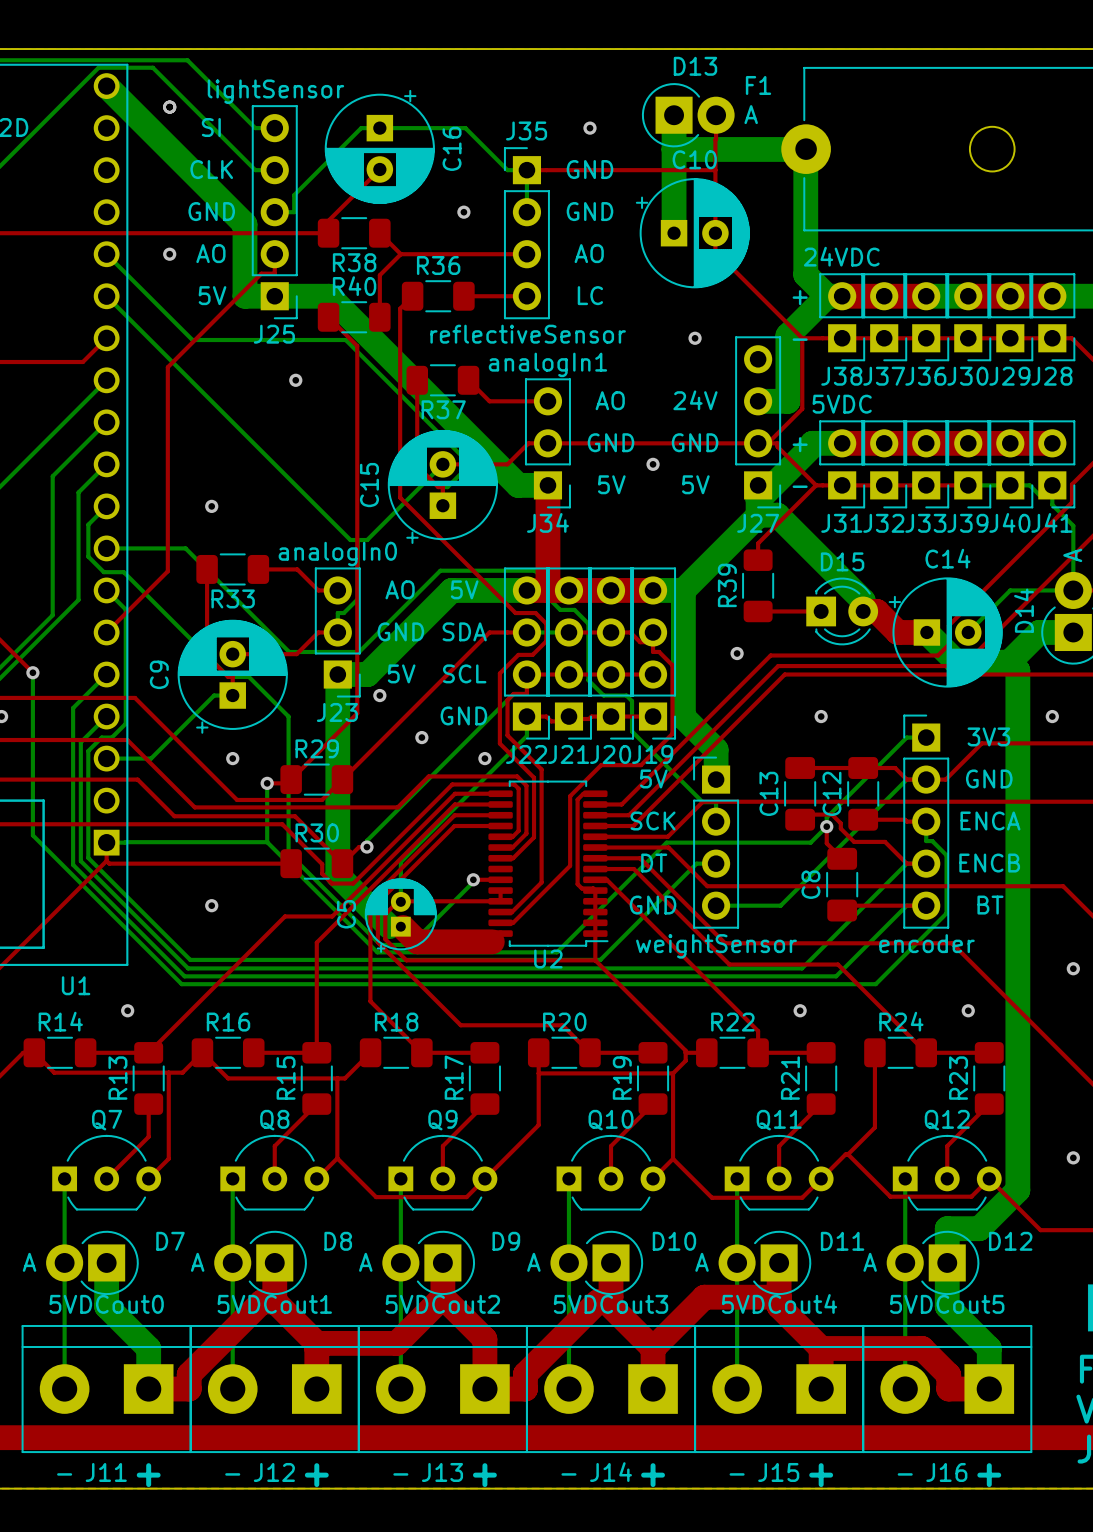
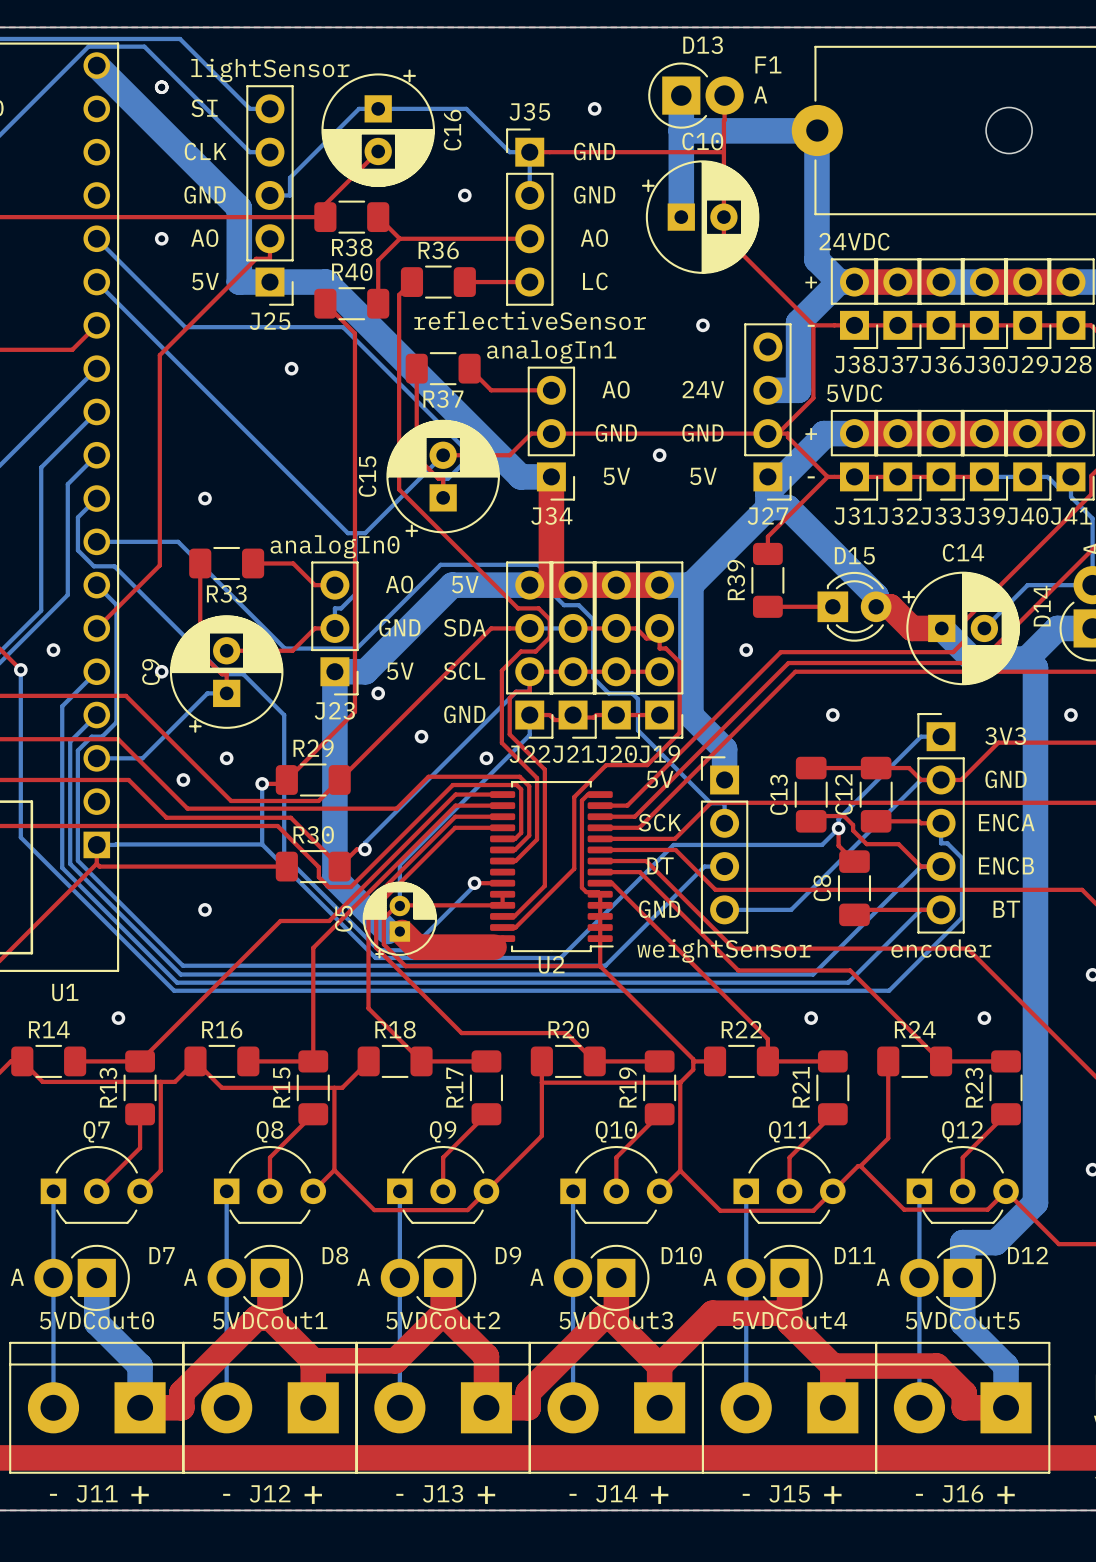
via: none -> (53, 650)
via: none -> (161, 671)
via: none -> (183, 779)

